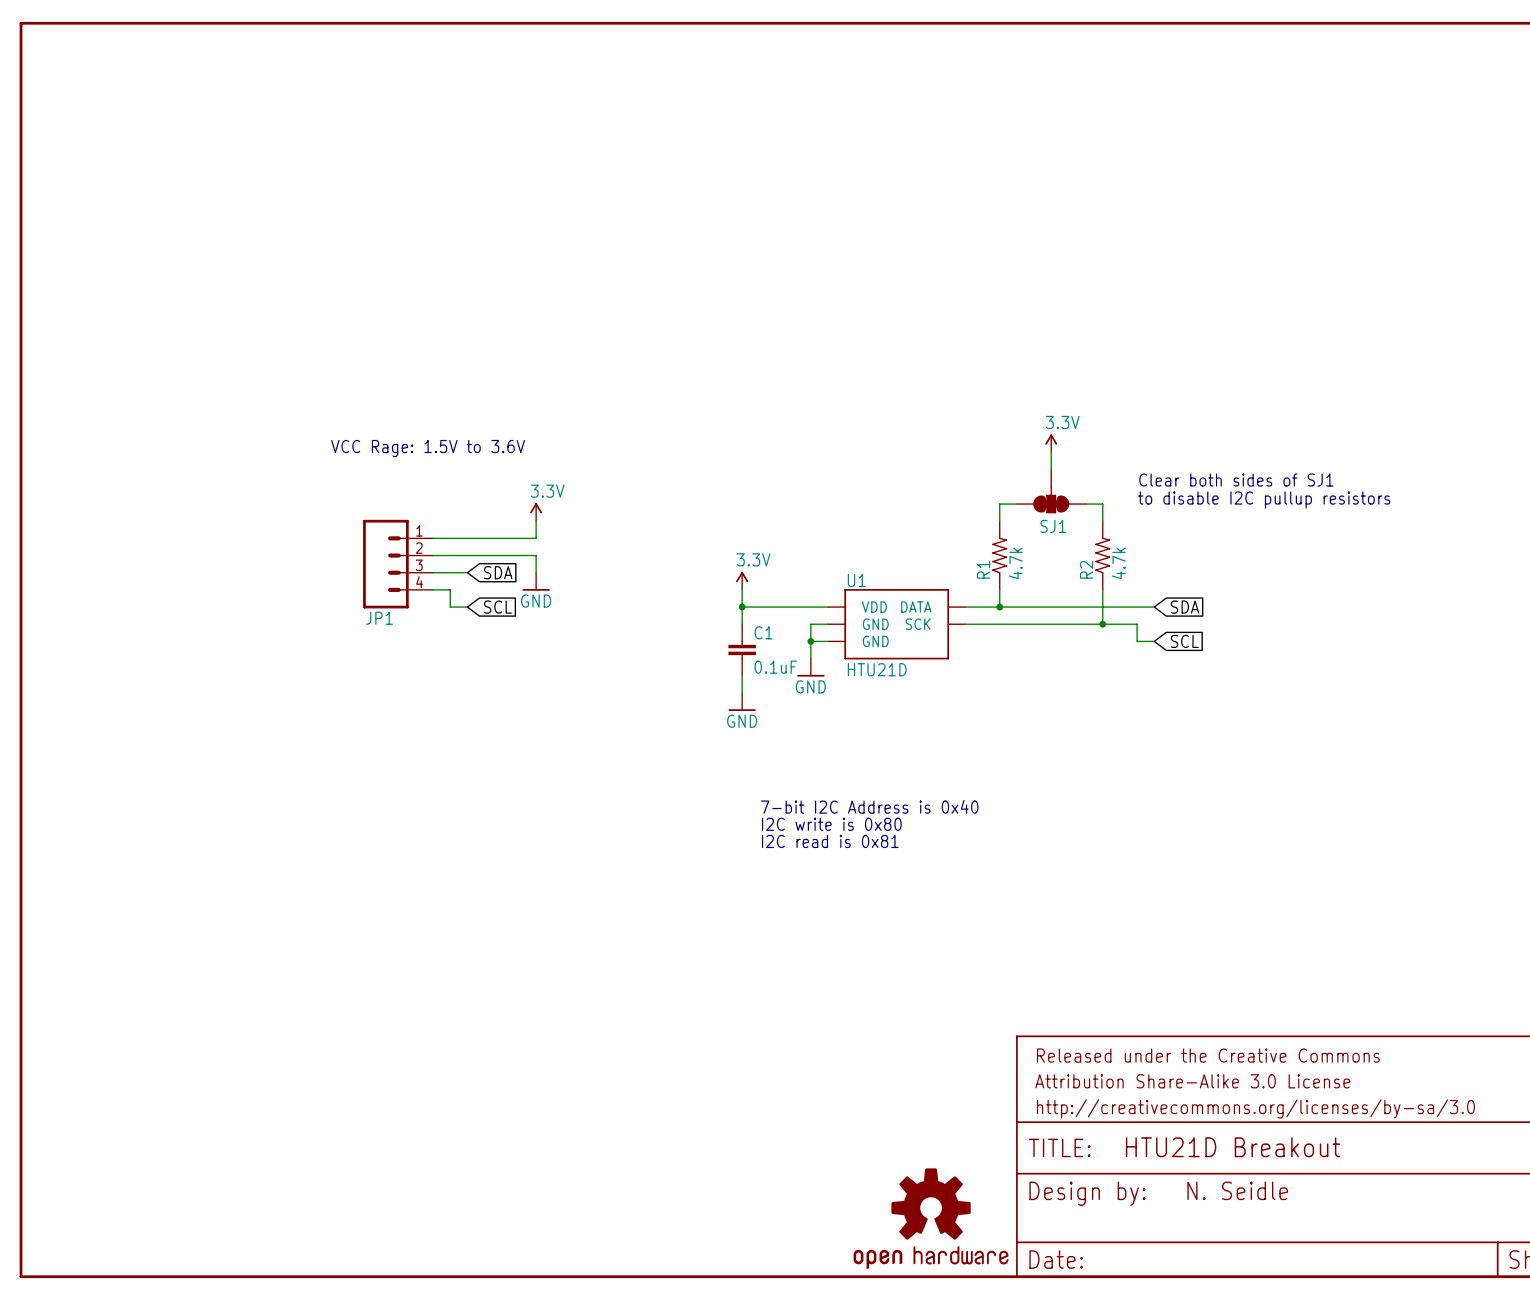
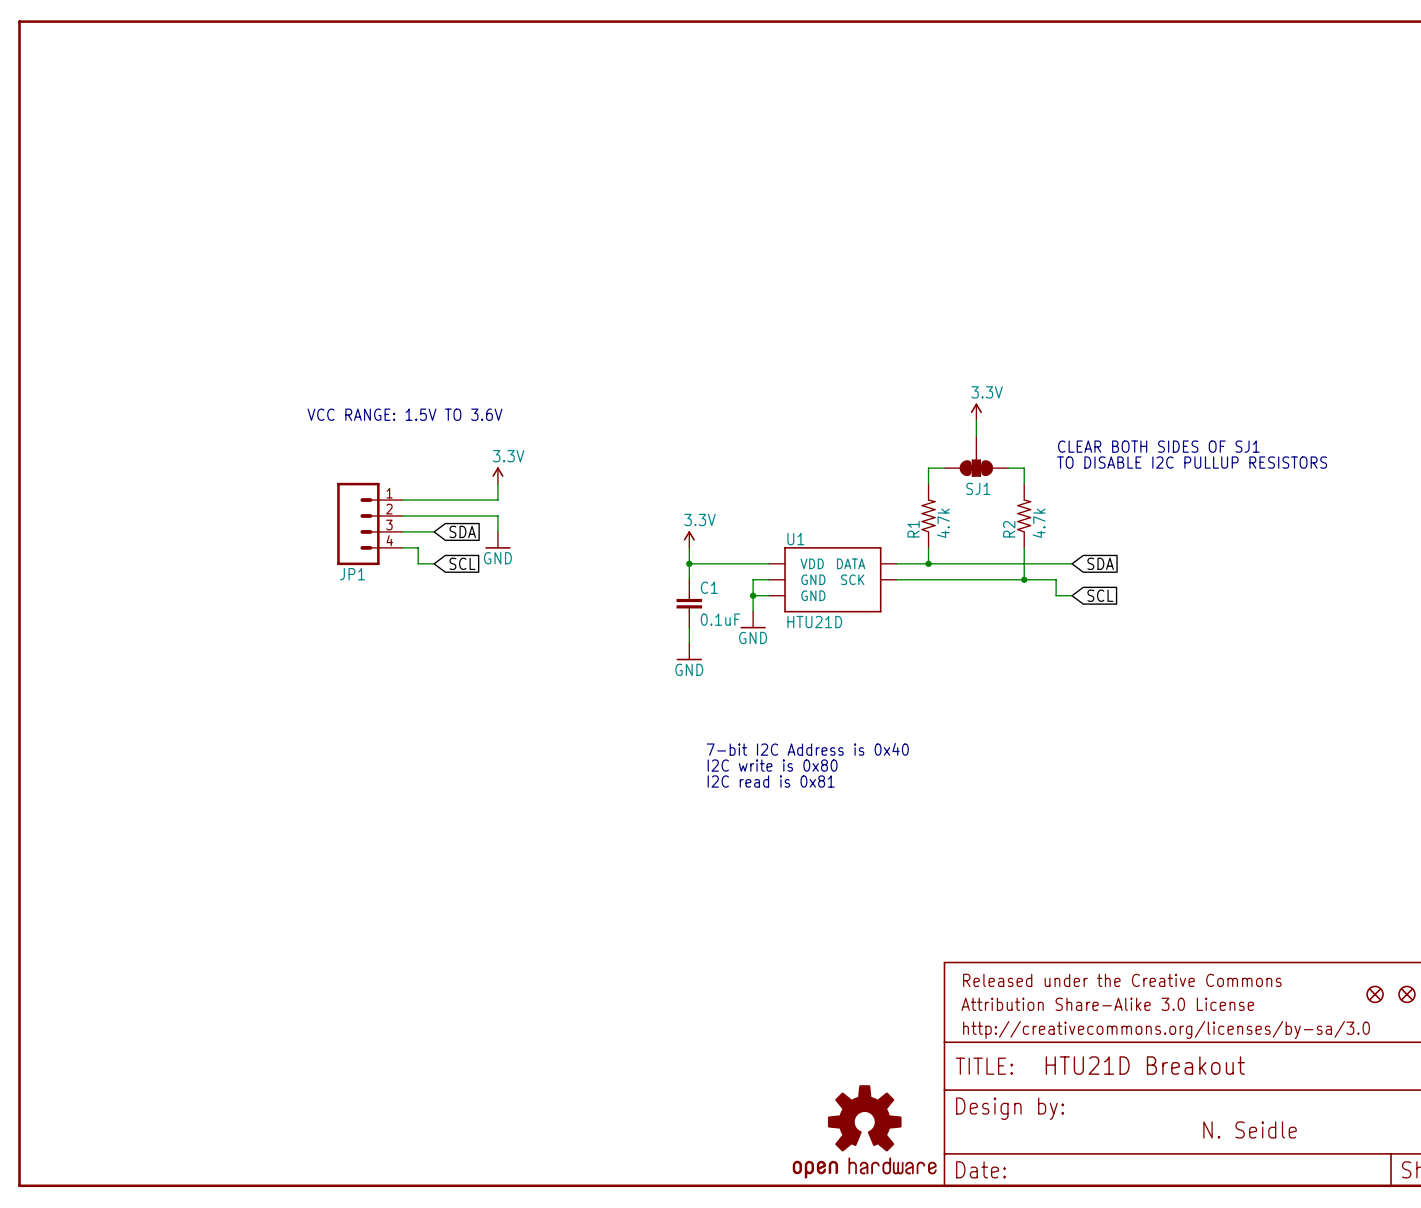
text: VCC Rage: 1.5V to 3.6V (428, 448) -> VCC RANGE: 1.5V TO 3.6V (405, 414)
text: Clear both sides of SJ1 (1236, 480) -> CLEAR BOTH SIDES OF SJ1 (1158, 446)
text: to disable I2C pullup resistors (1264, 500) -> TO DISABLE I2C PULLUP RESISTORS (1192, 462)
part: none -> (1375, 994)
part: none -> (1406, 994)
text position: N. Seidle (1237, 1190) -> N. Seidle (1250, 1129)

